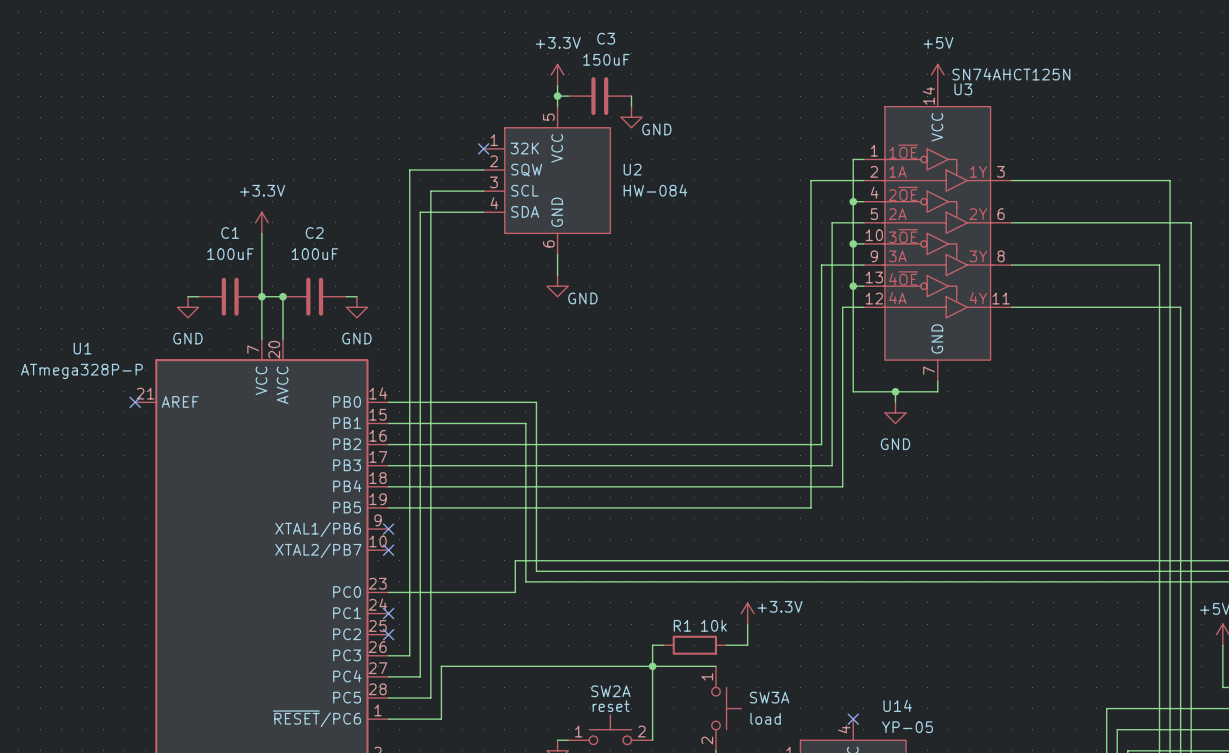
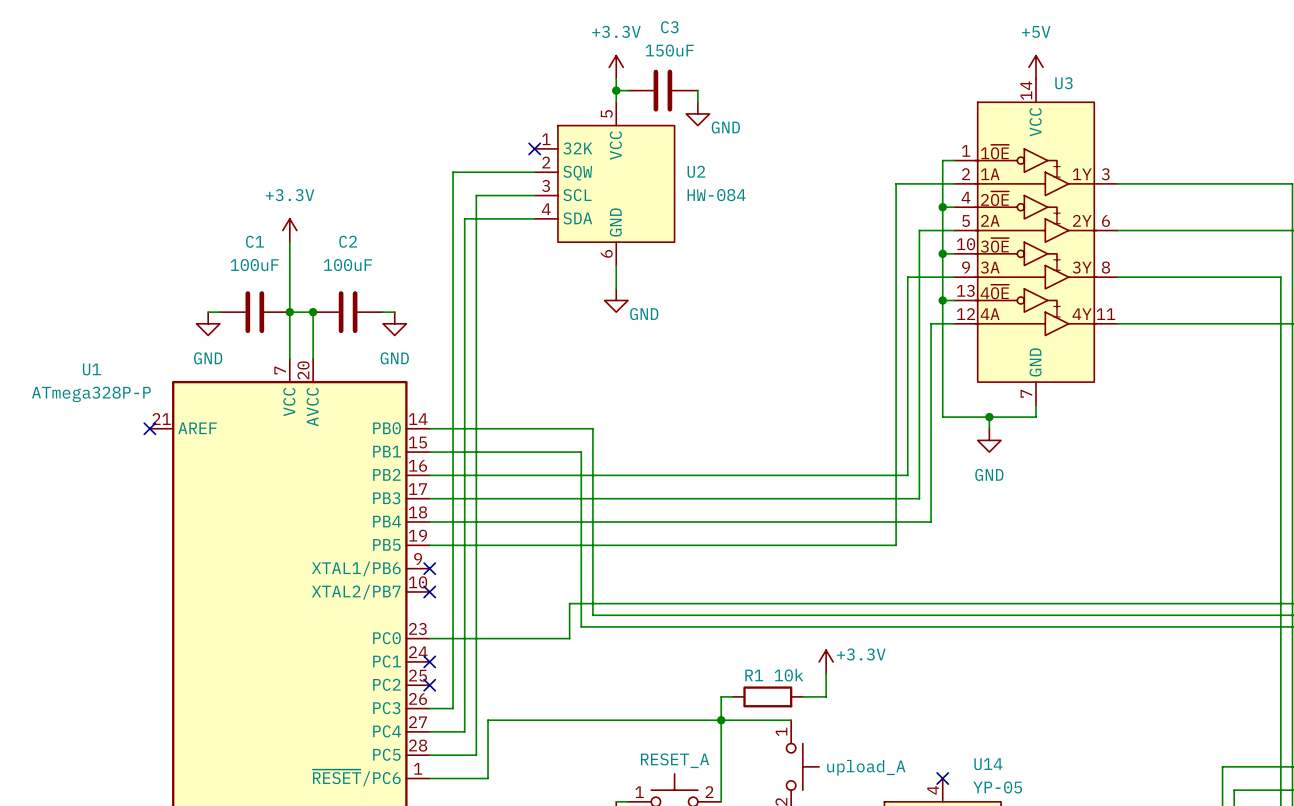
U3 value: SN74AHCT125N (1011, 74) -> none
SW2A name: SW2A (610, 691) -> RESET_A (675, 760)
SW3A name: SW3A (769, 697) -> upload_A (866, 767)
SW2A value: reset (611, 706) -> none
SW3A value: load (765, 718) -> none

